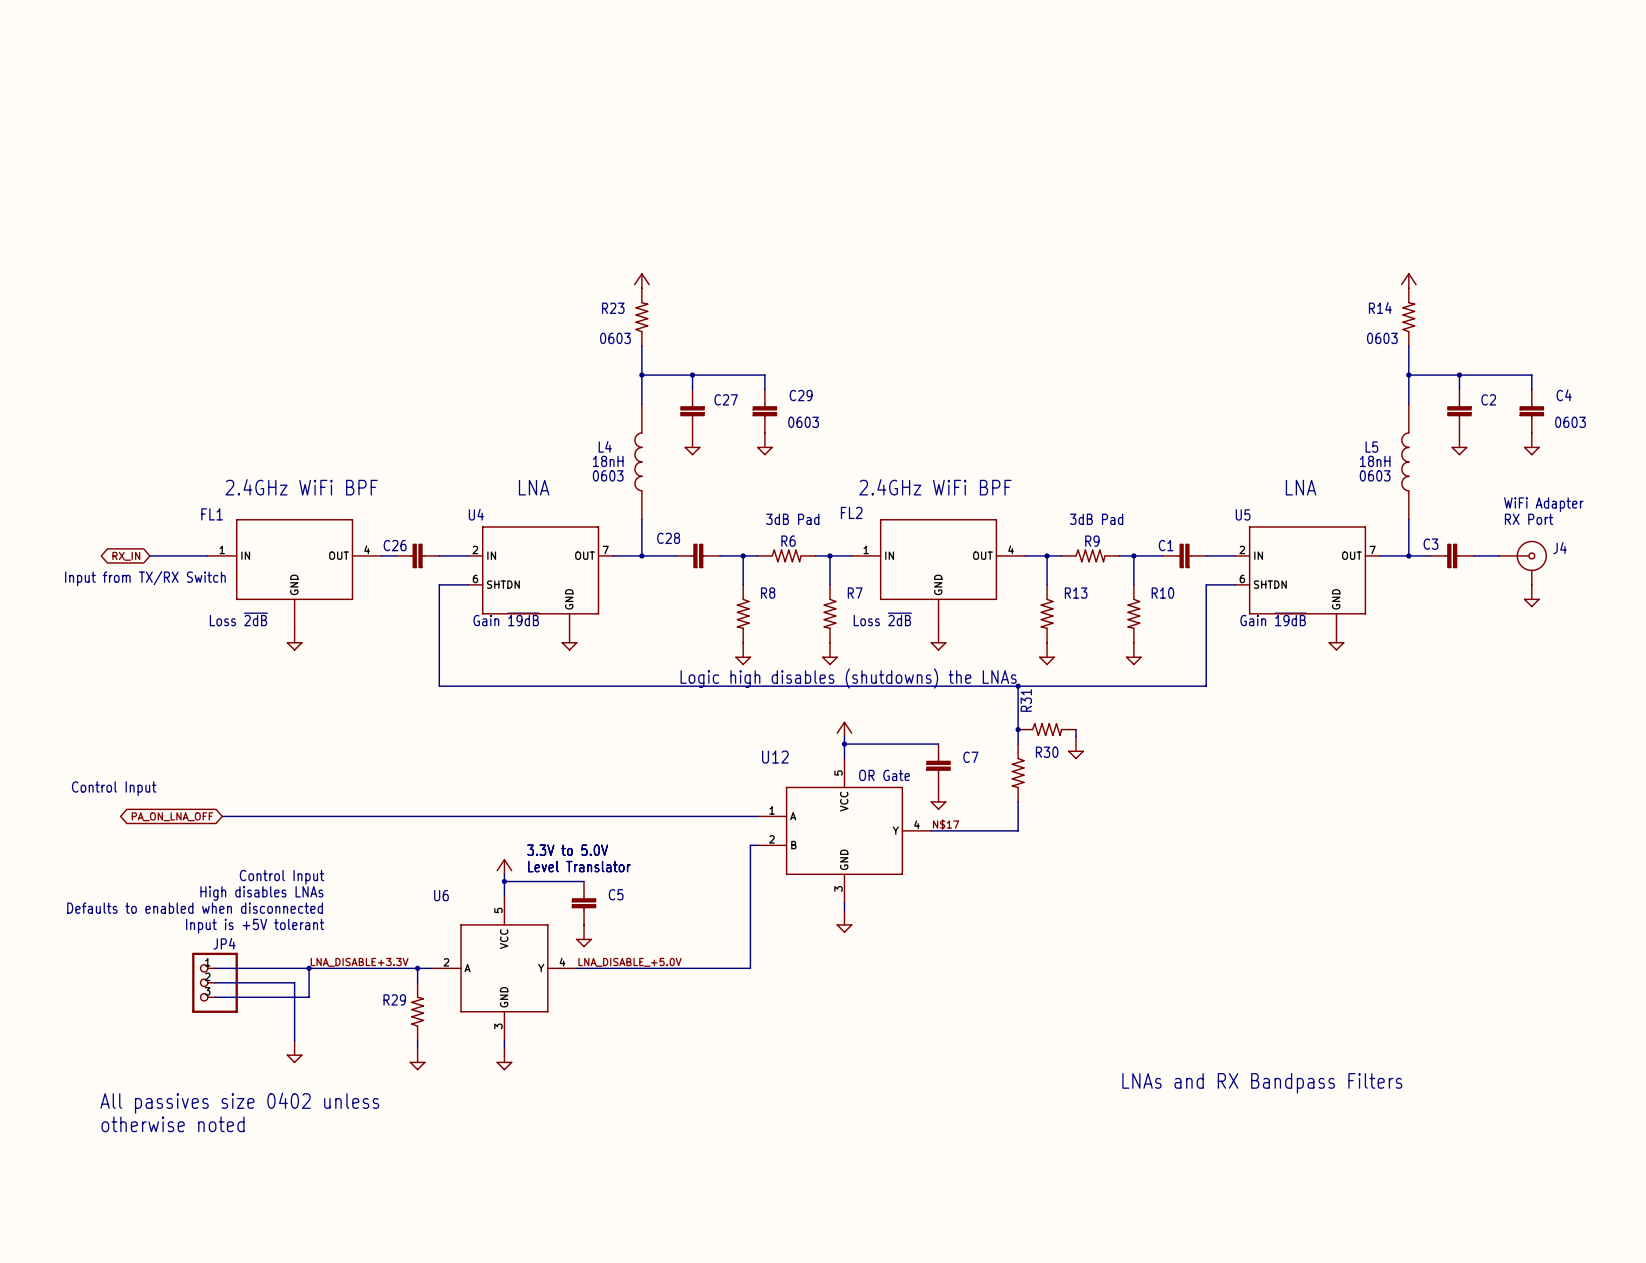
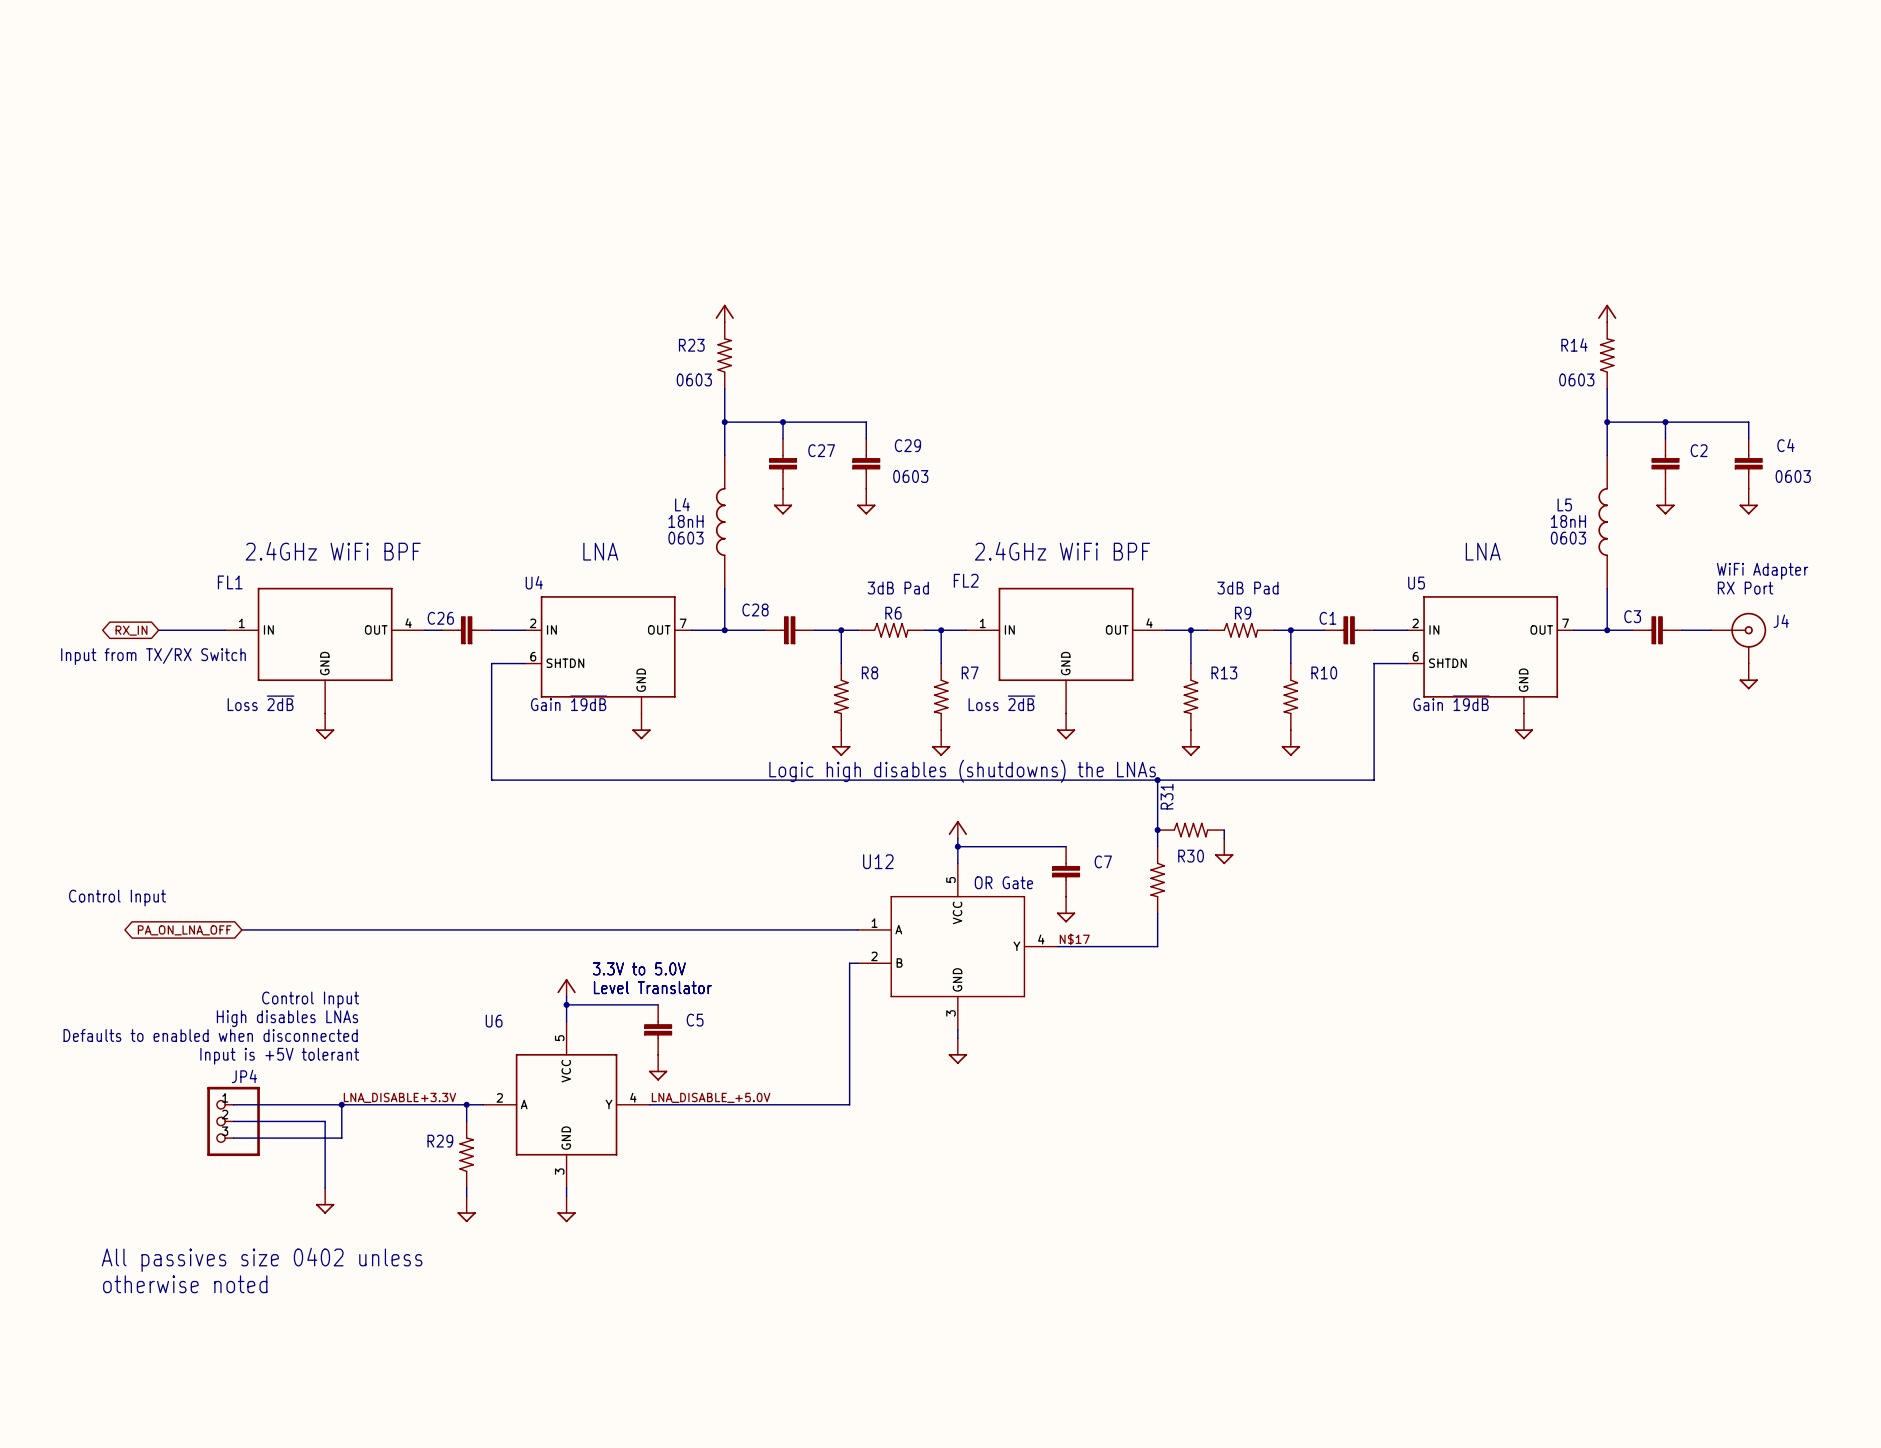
text: LNAs and RX Bandpass Filters (1262, 1083) -> none

